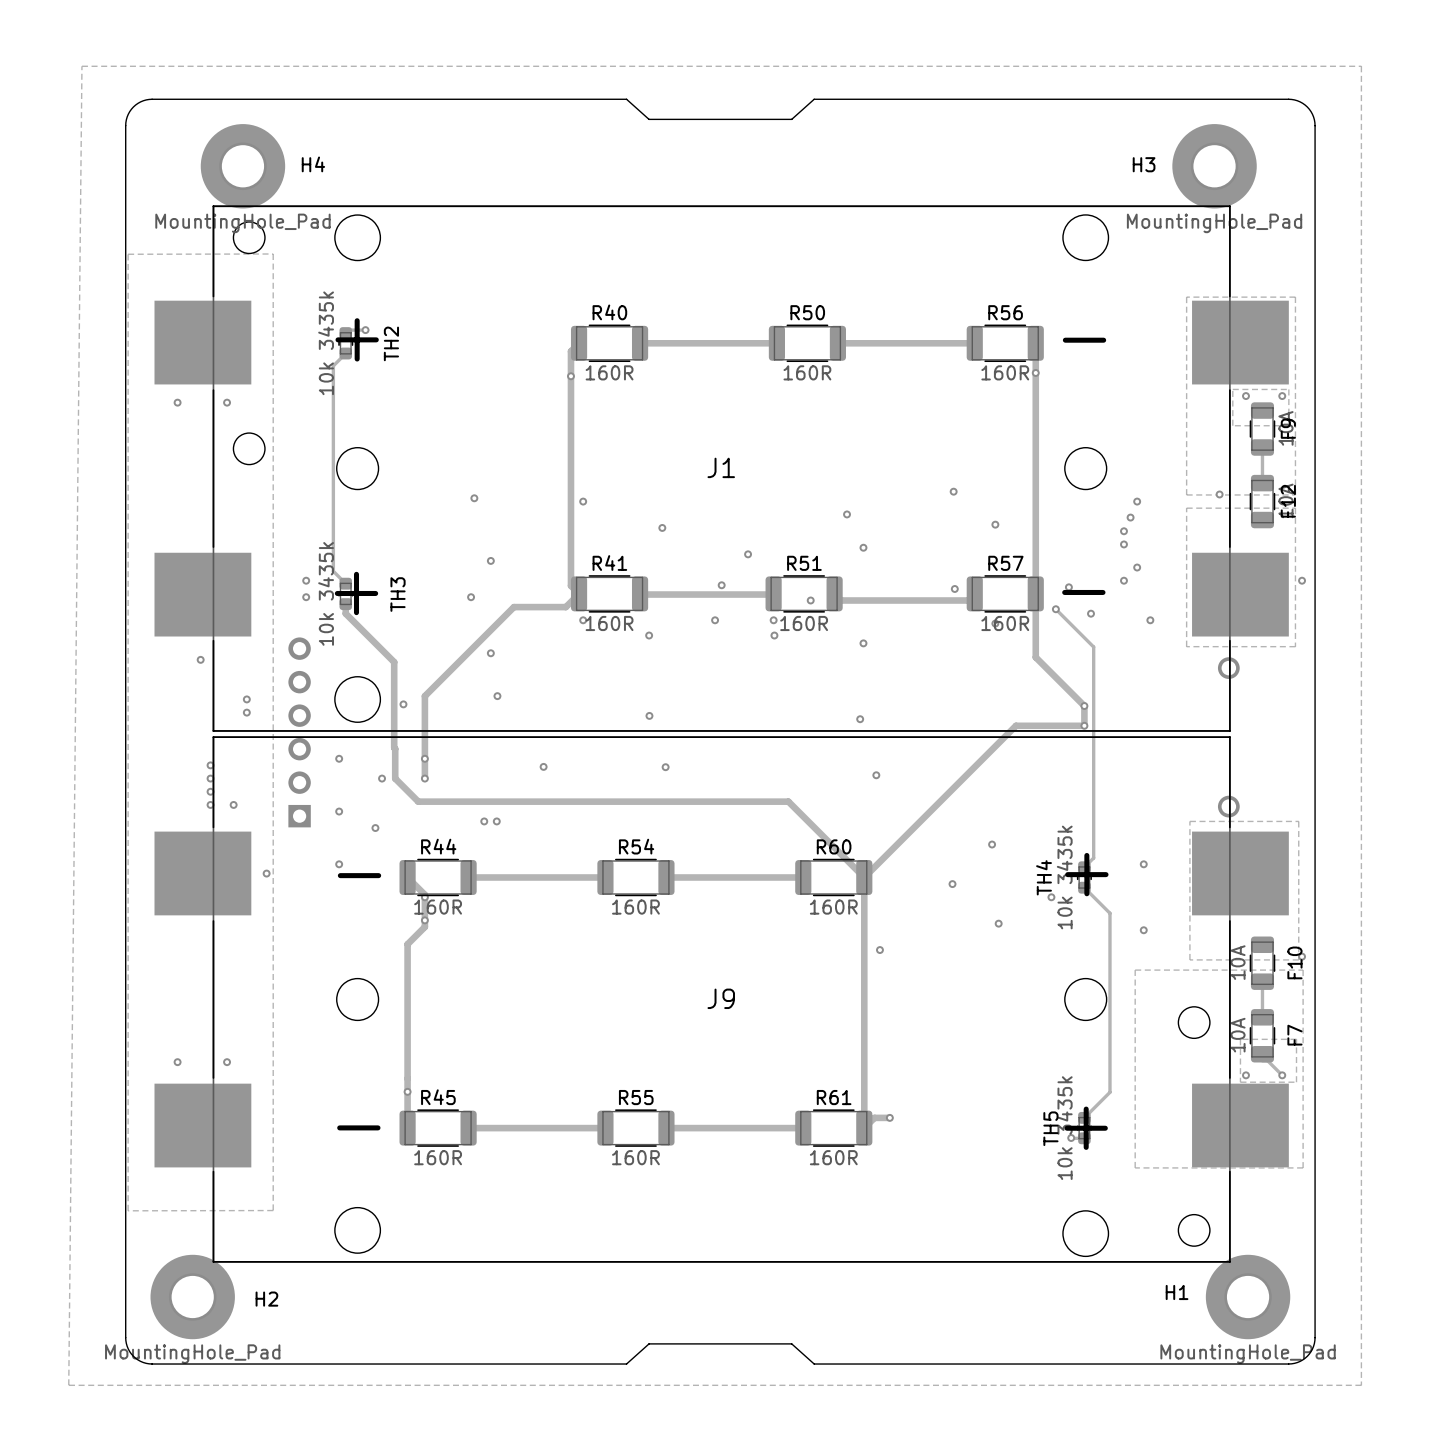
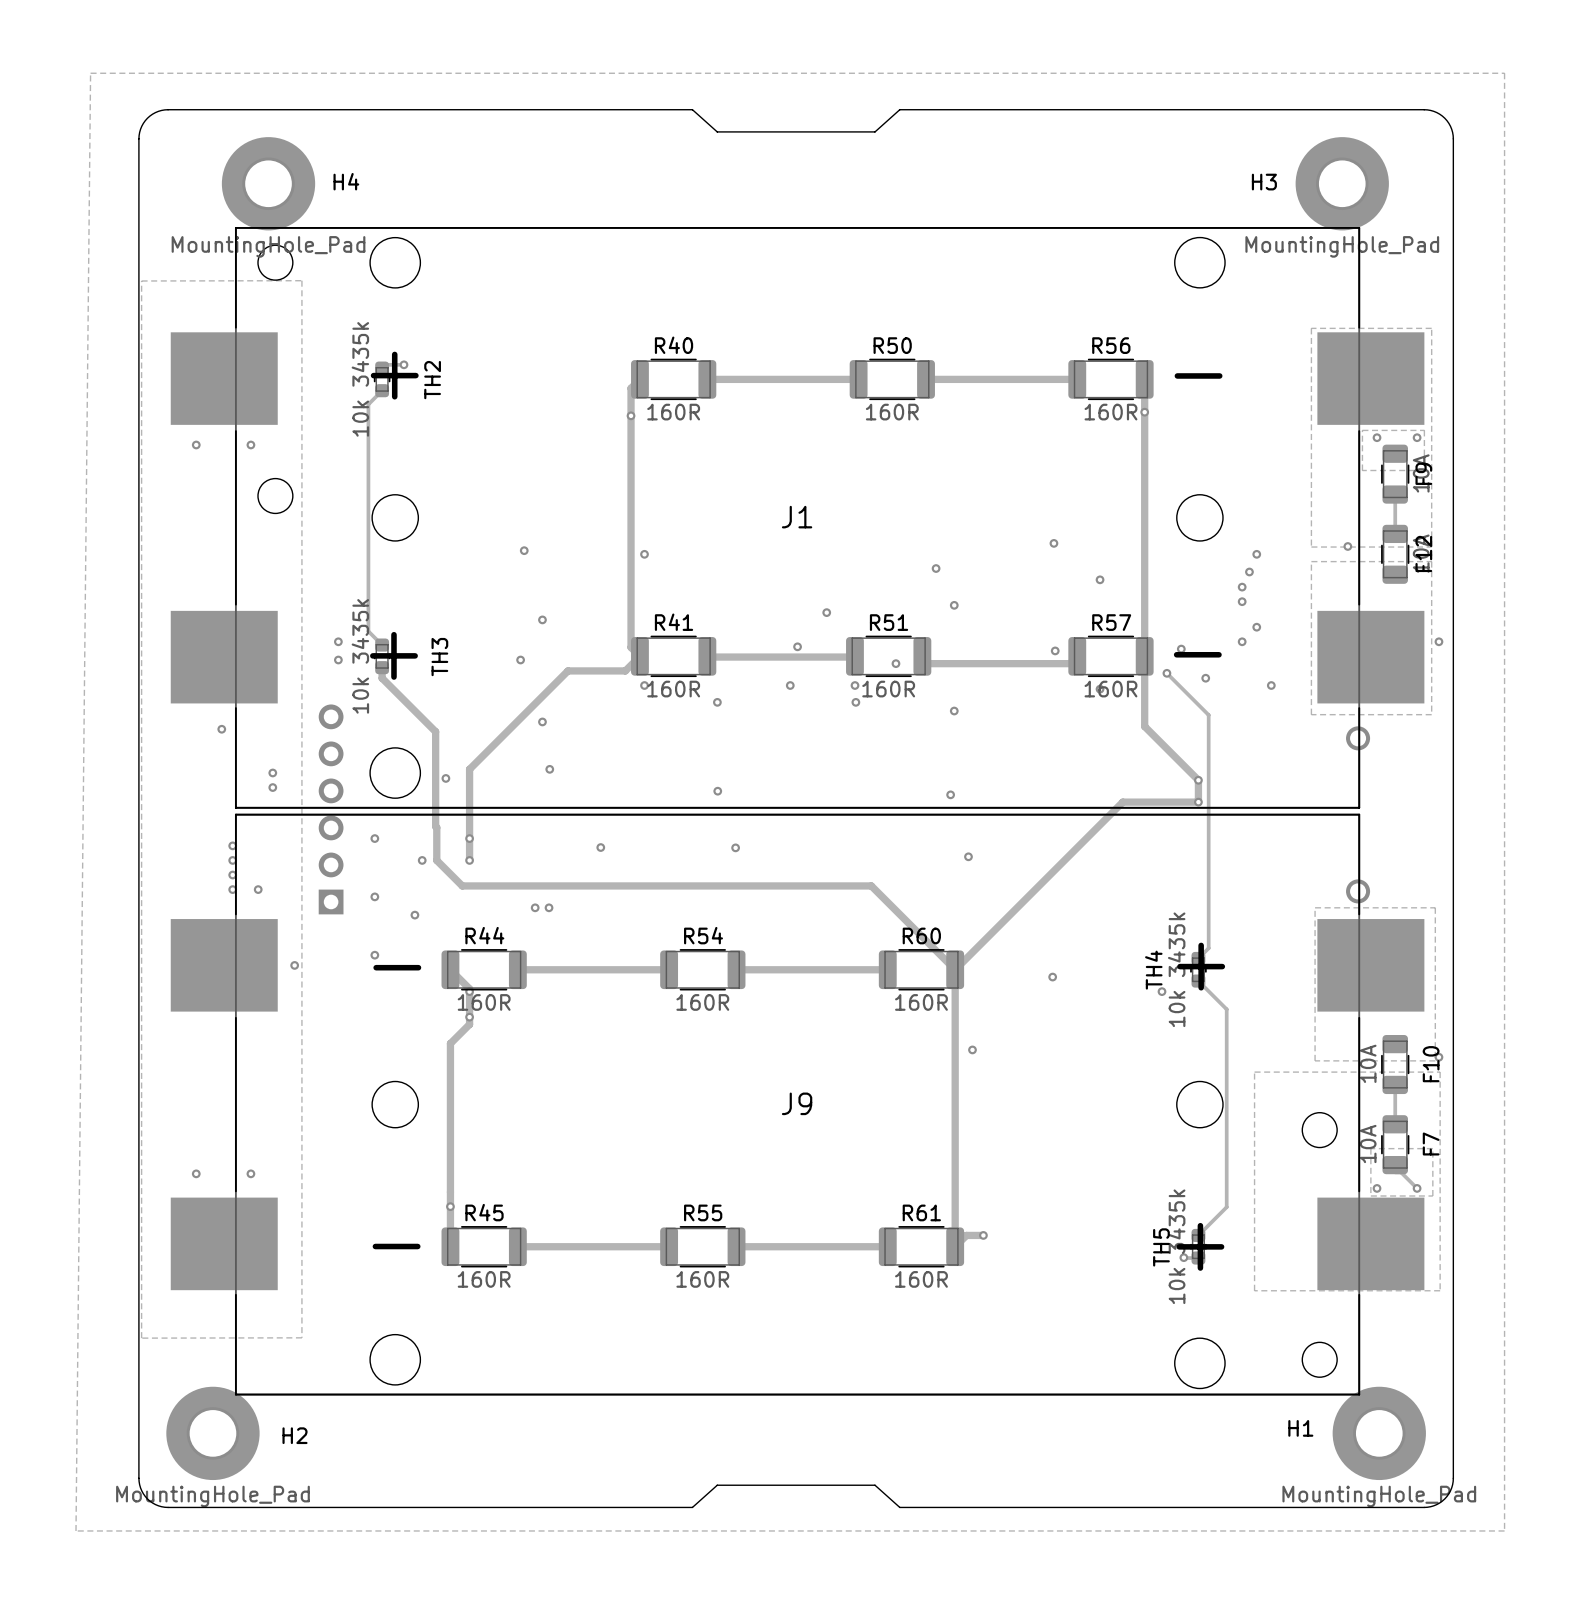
via: (662, 527) -> none
via: (992, 844) -> none
via: (1143, 864) -> none
via: (998, 923) -> none
via: (1143, 930) -> none

